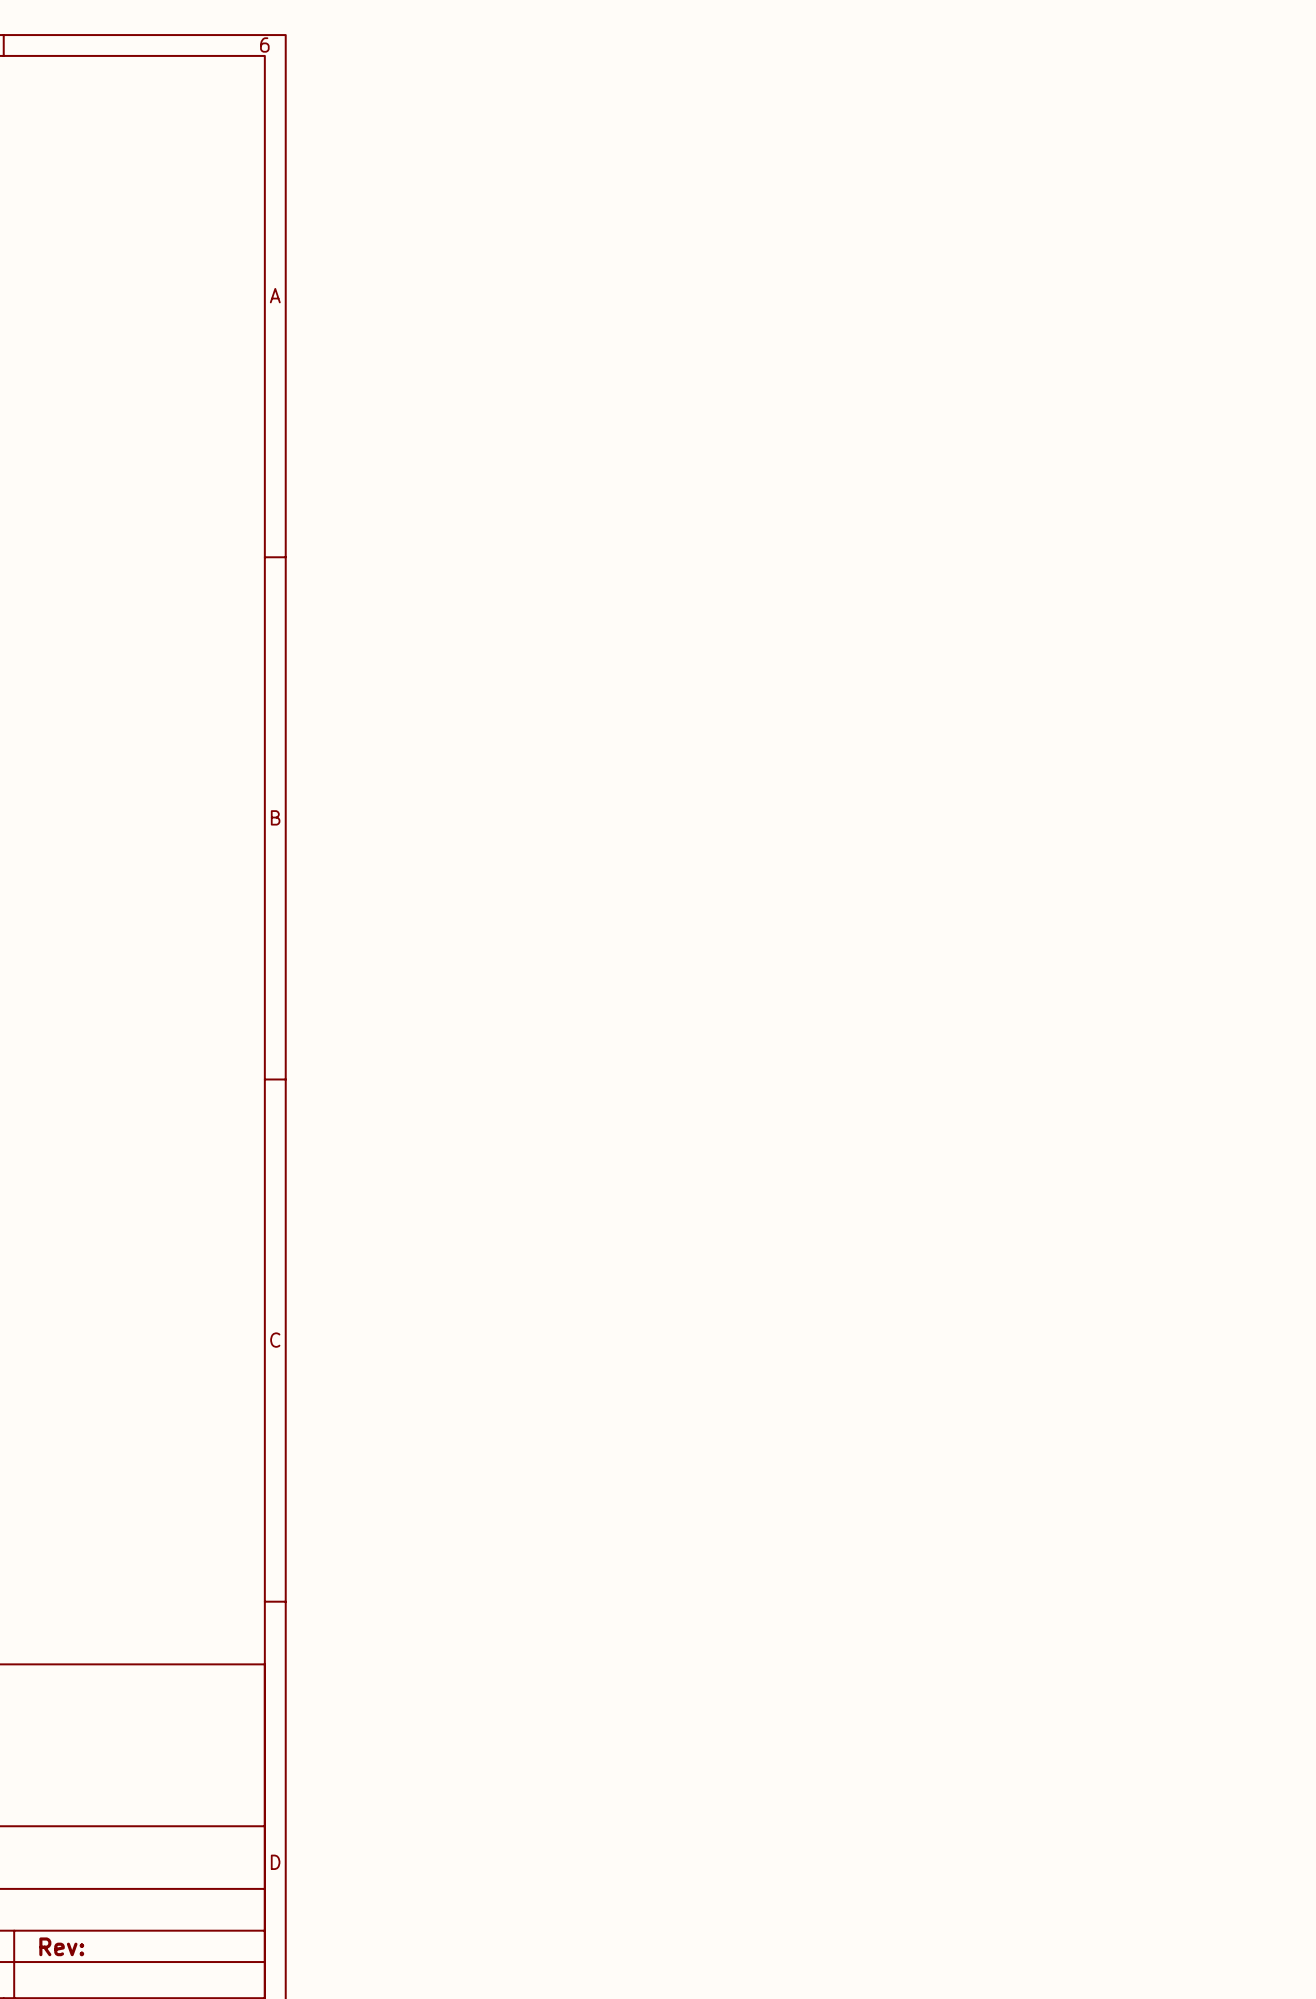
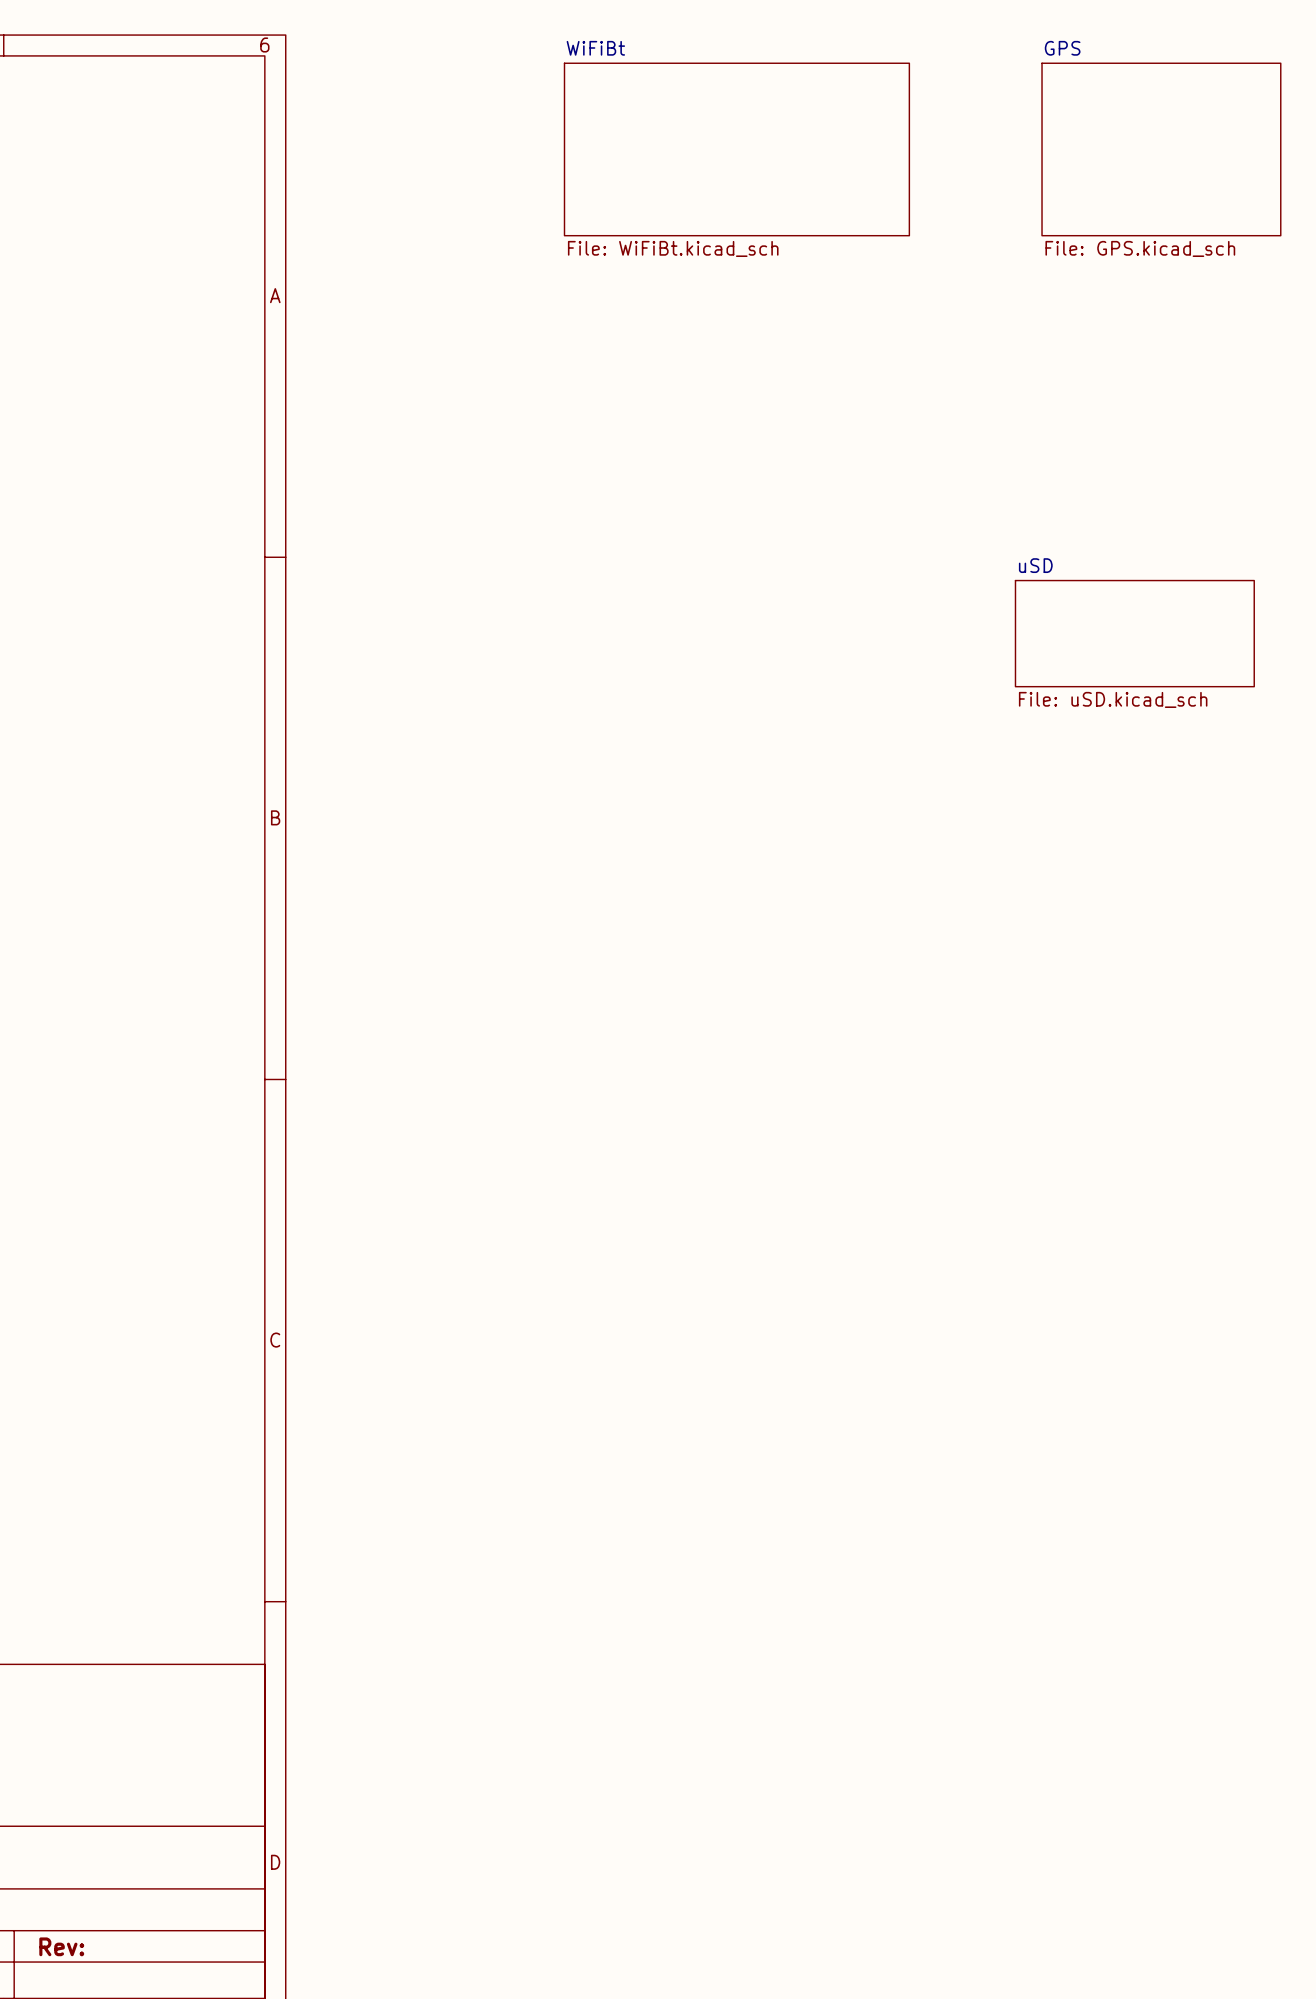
sheet WiFiBt: none -> File: WiFiBt.kicad_sch (736, 149)
sheet GPS: none -> File: GPS.kicad_sch (1161, 149)
sheet uSD: none -> File: uSD.kicad_sch (1134, 633)

